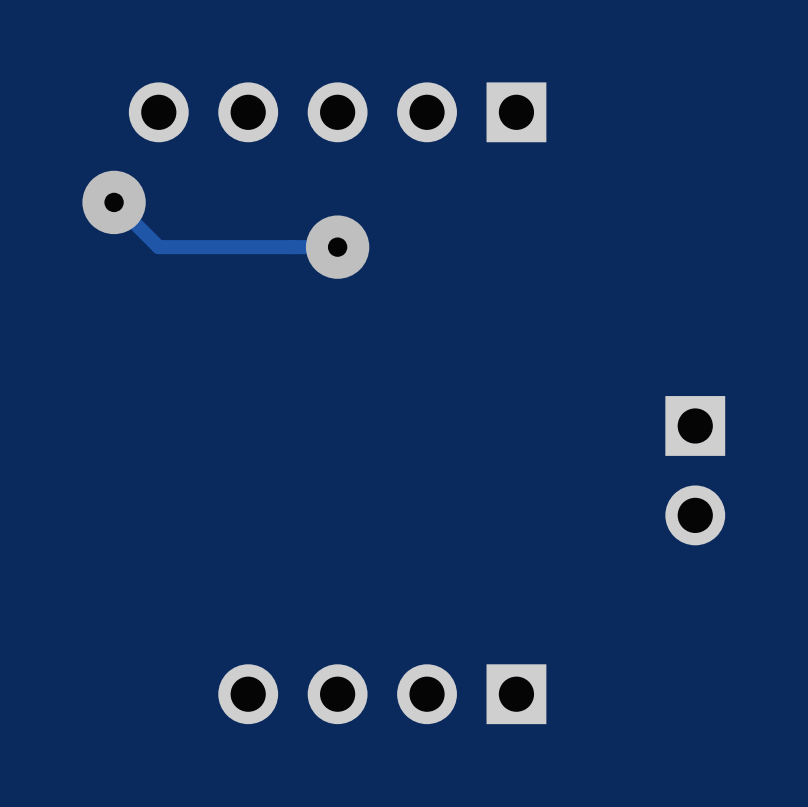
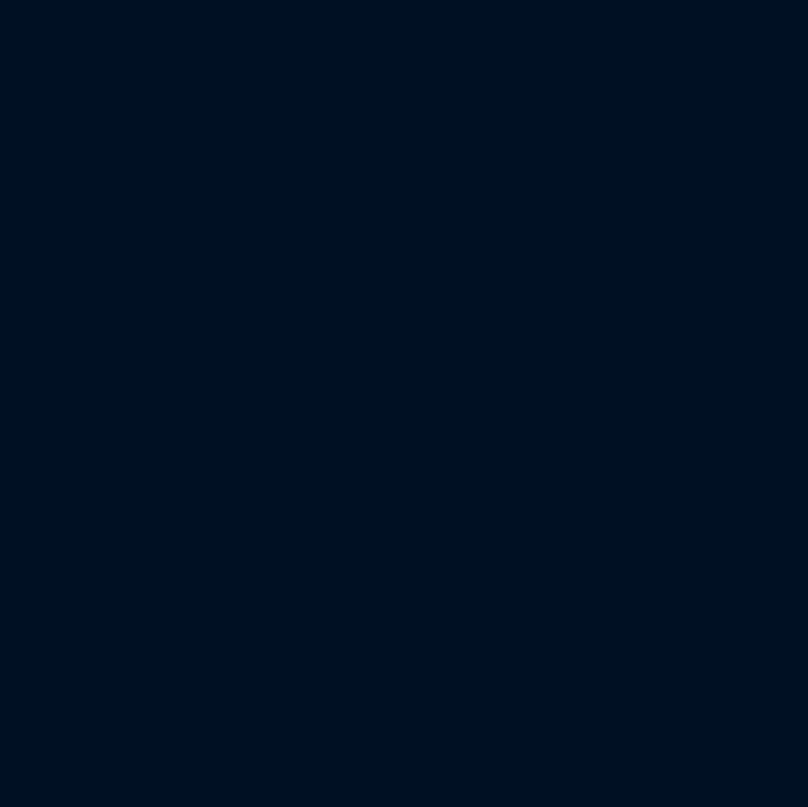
part: (337, 112) -> none
track: (114, 202) (158, 247) (337, 247) -> none
via: (114, 202) -> none
via: (337, 247) -> none
part: (695, 470) -> none
part: (382, 694) -> none

